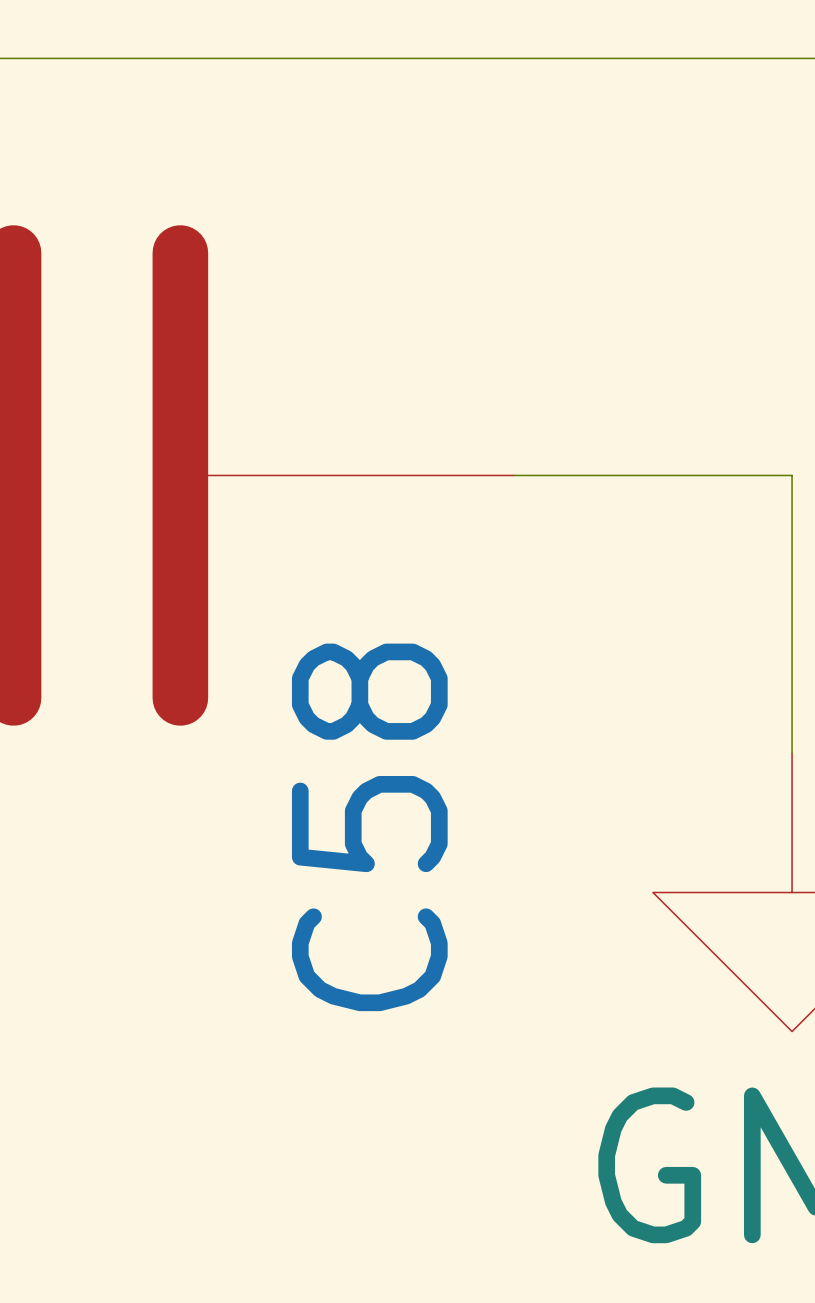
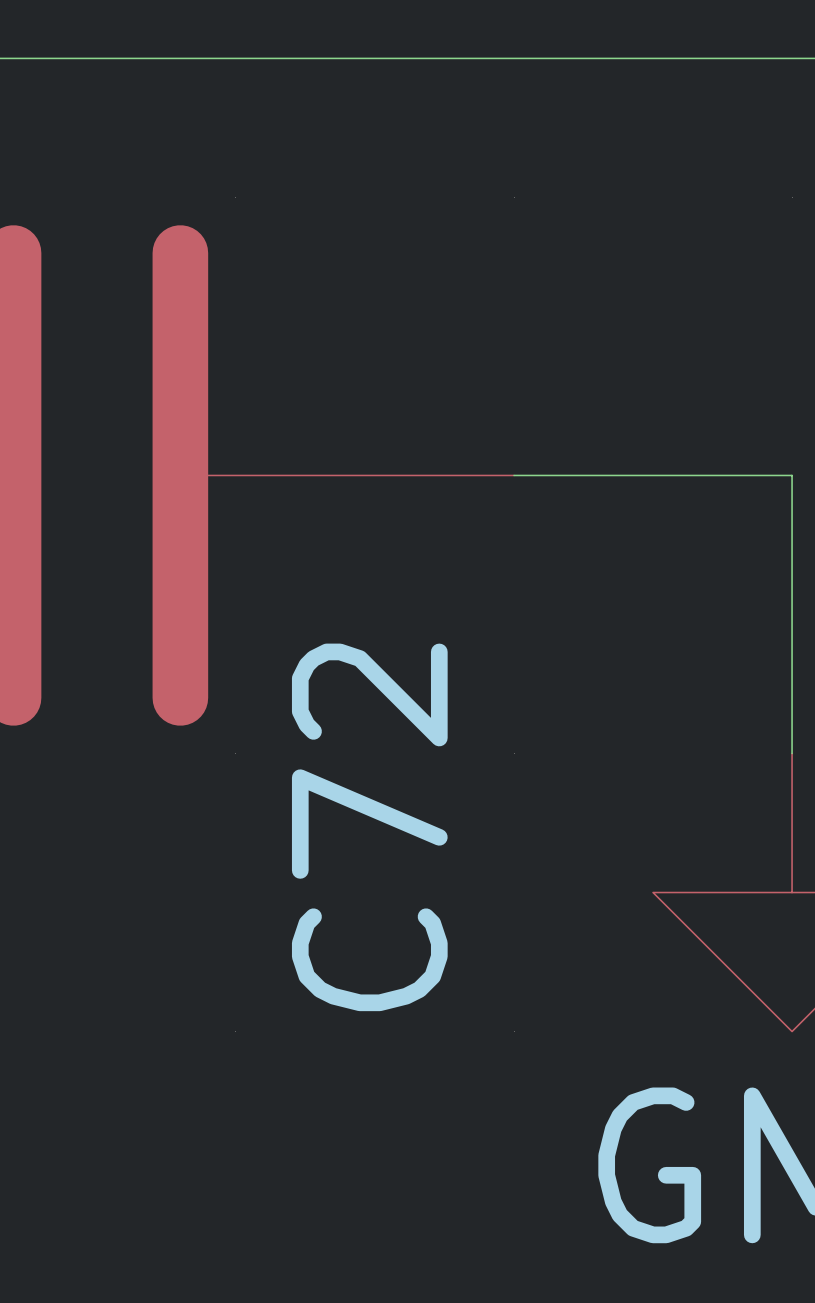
C58 name: C58 (369, 827) -> C72 (369, 827)

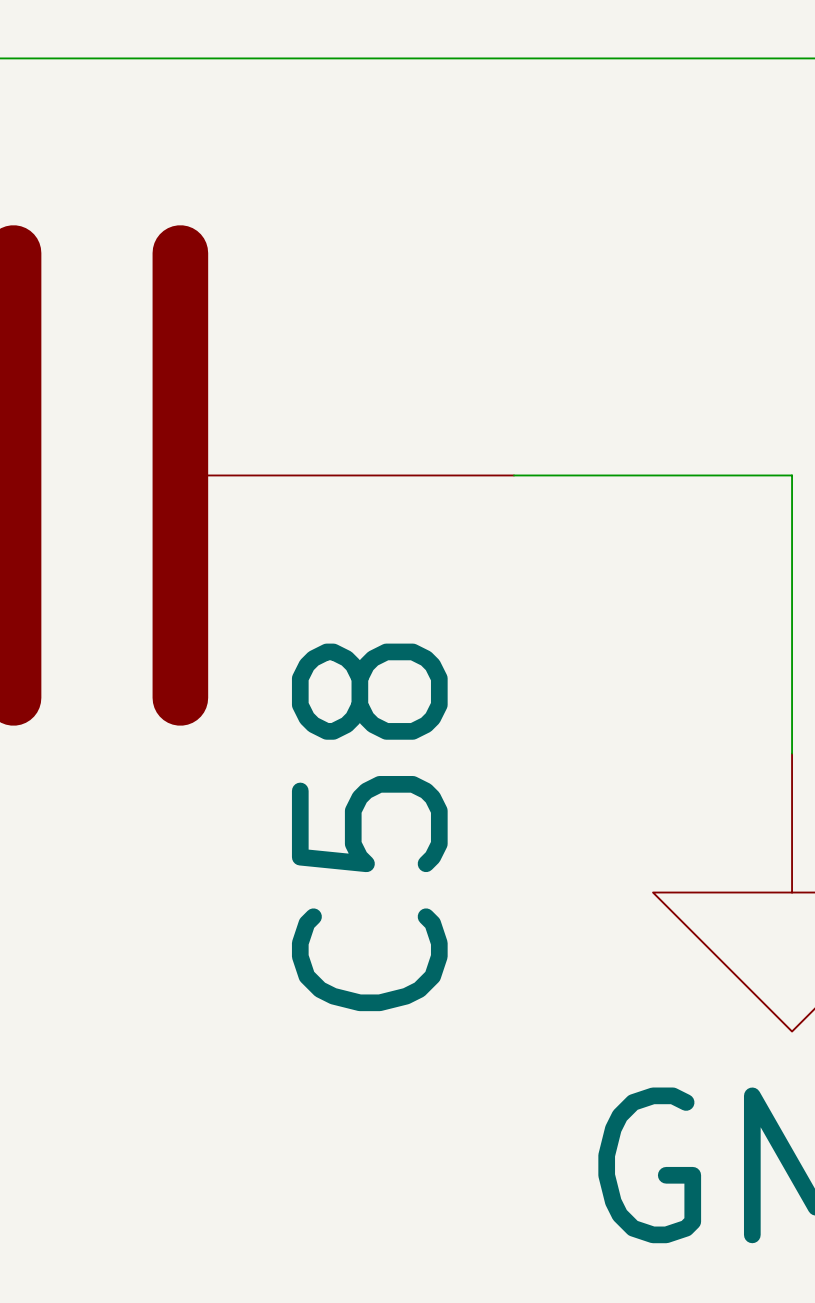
C72 name: C72 (369, 827) -> C58 (369, 827)

